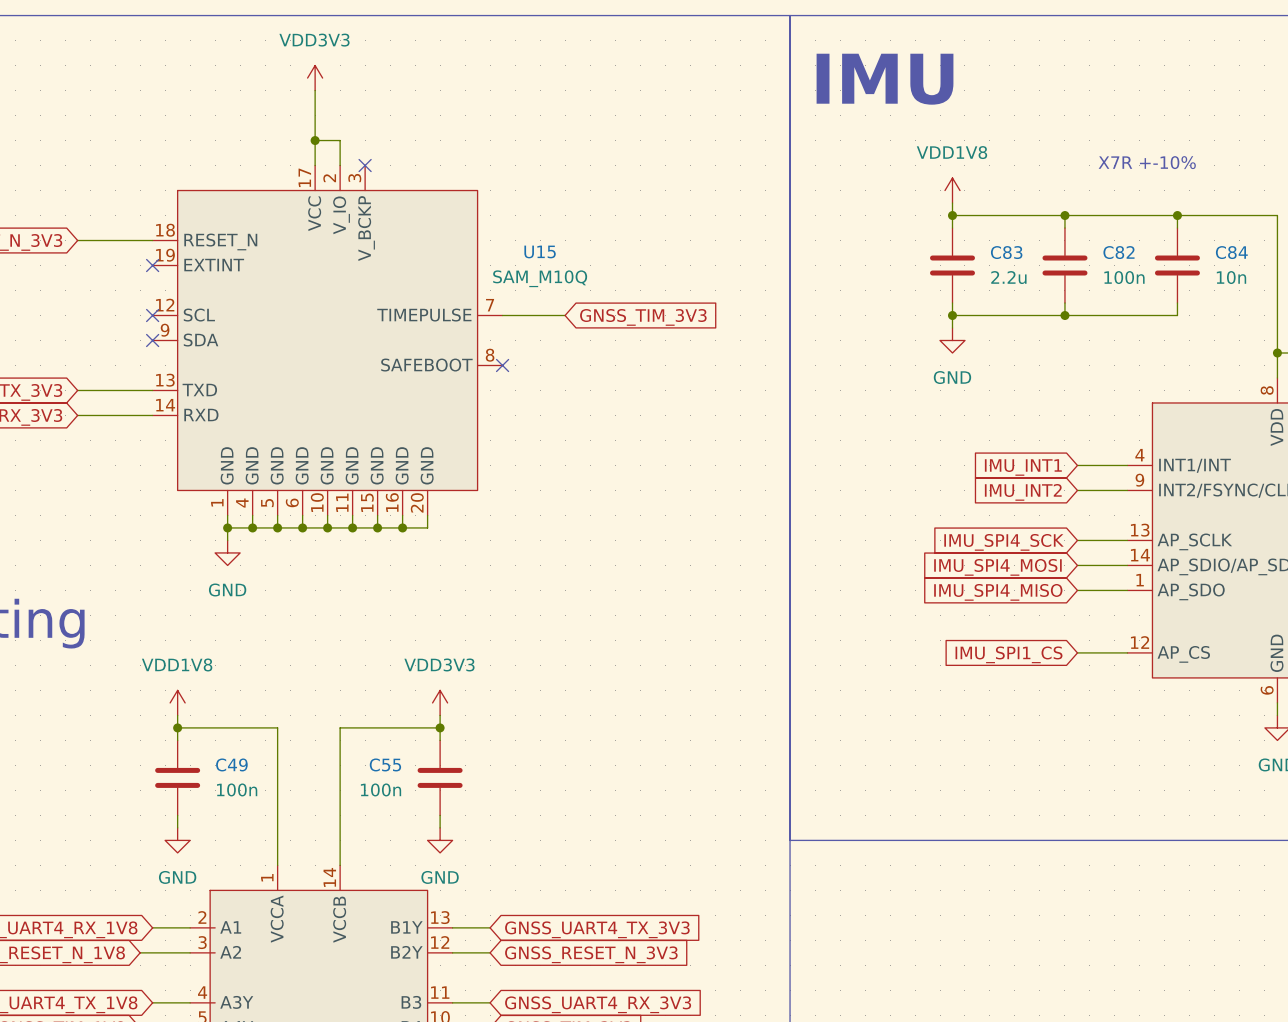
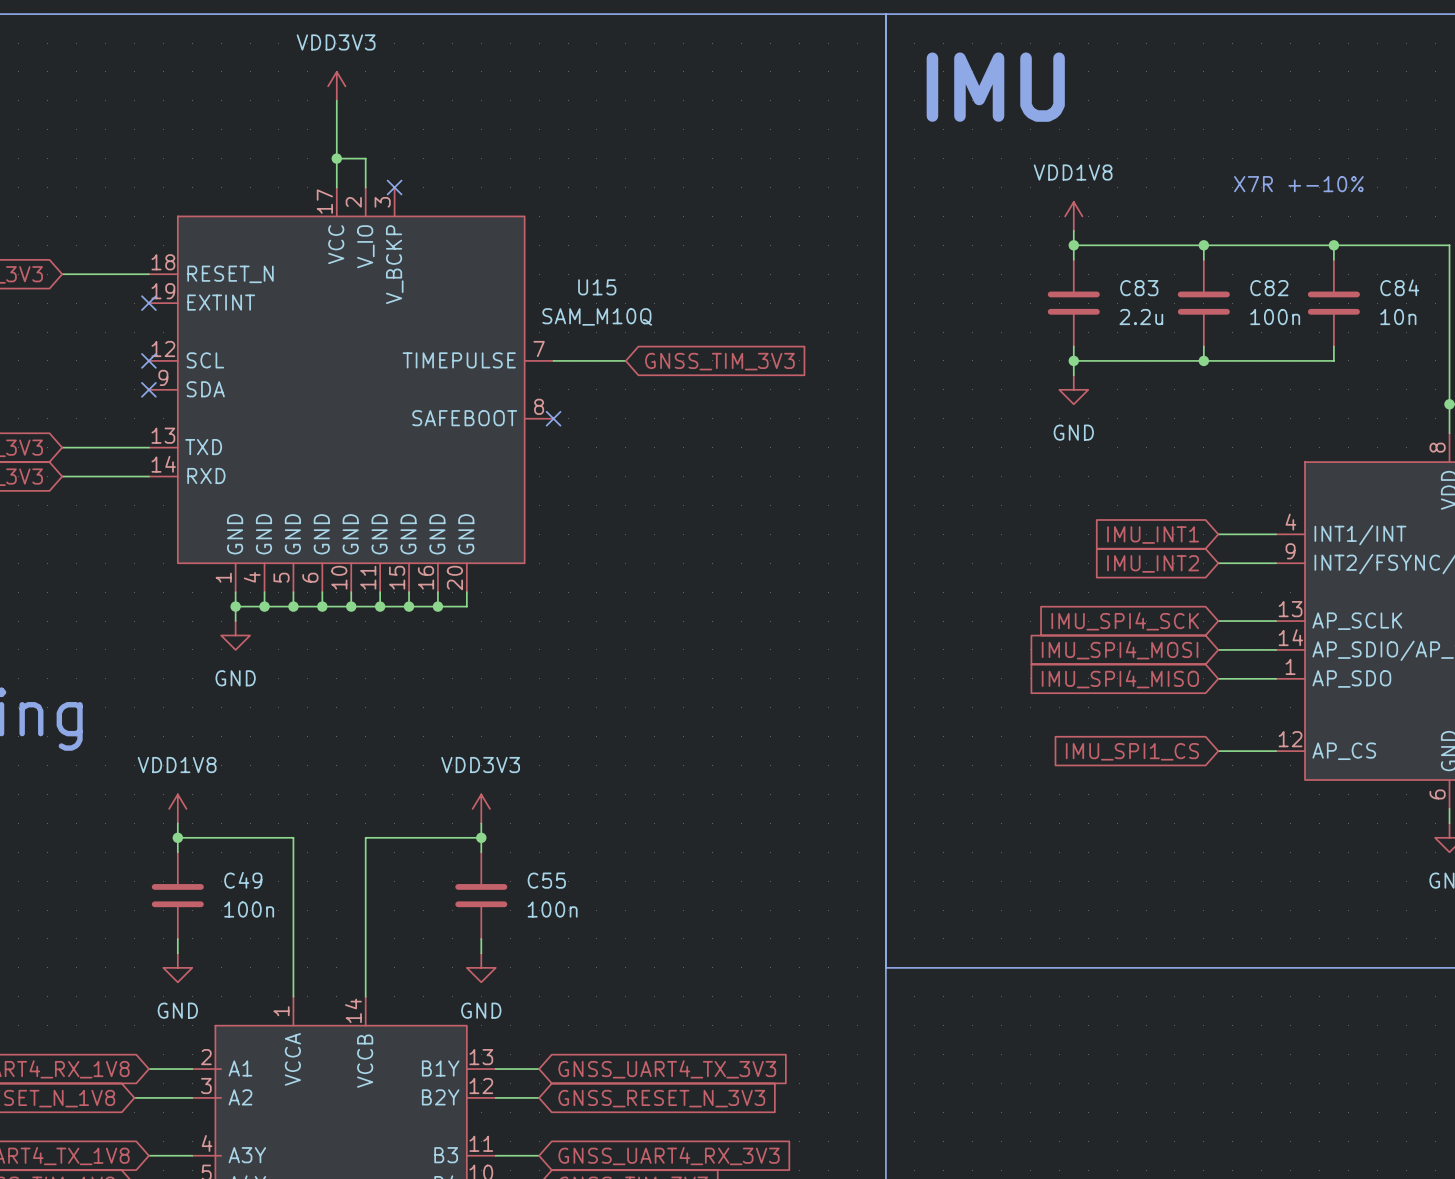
C55 name position: C55 (385, 764) -> C55 (546, 880)
C55 value position: 100n (381, 789) -> 100n (552, 909)

